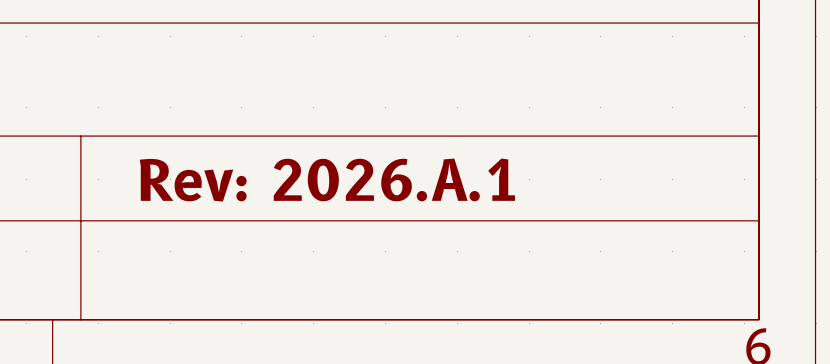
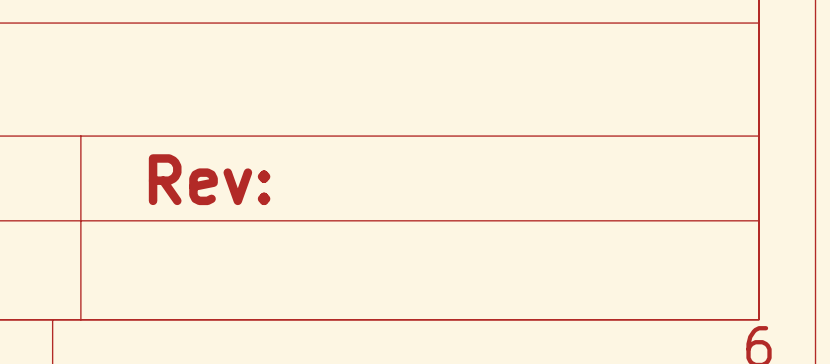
title block: Rev: 2026.A.1 (327, 180) -> Rev: (209, 179)

